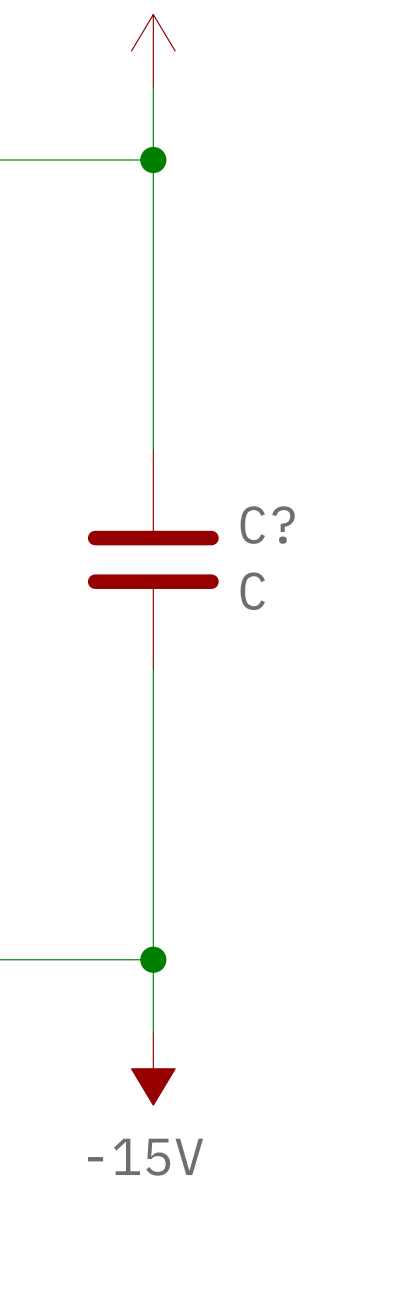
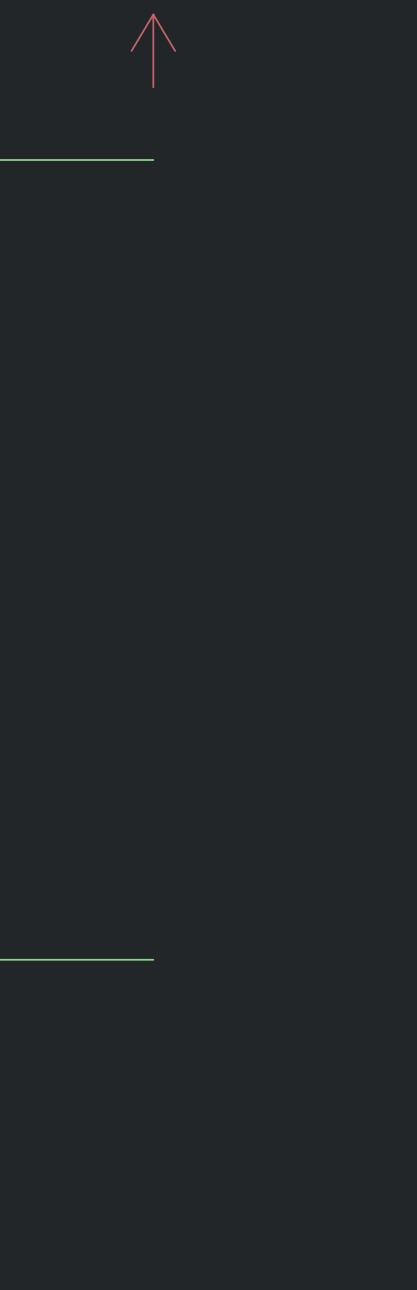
wire: (153, 87) (153, 450) -> none
junction: (153, 160) -> none
C?: C (153, 559) -> none
wire: (153, 668) (153, 1032) -> none
junction: (153, 959) -> none
power symbol: -15V (153, 1068) -> none

